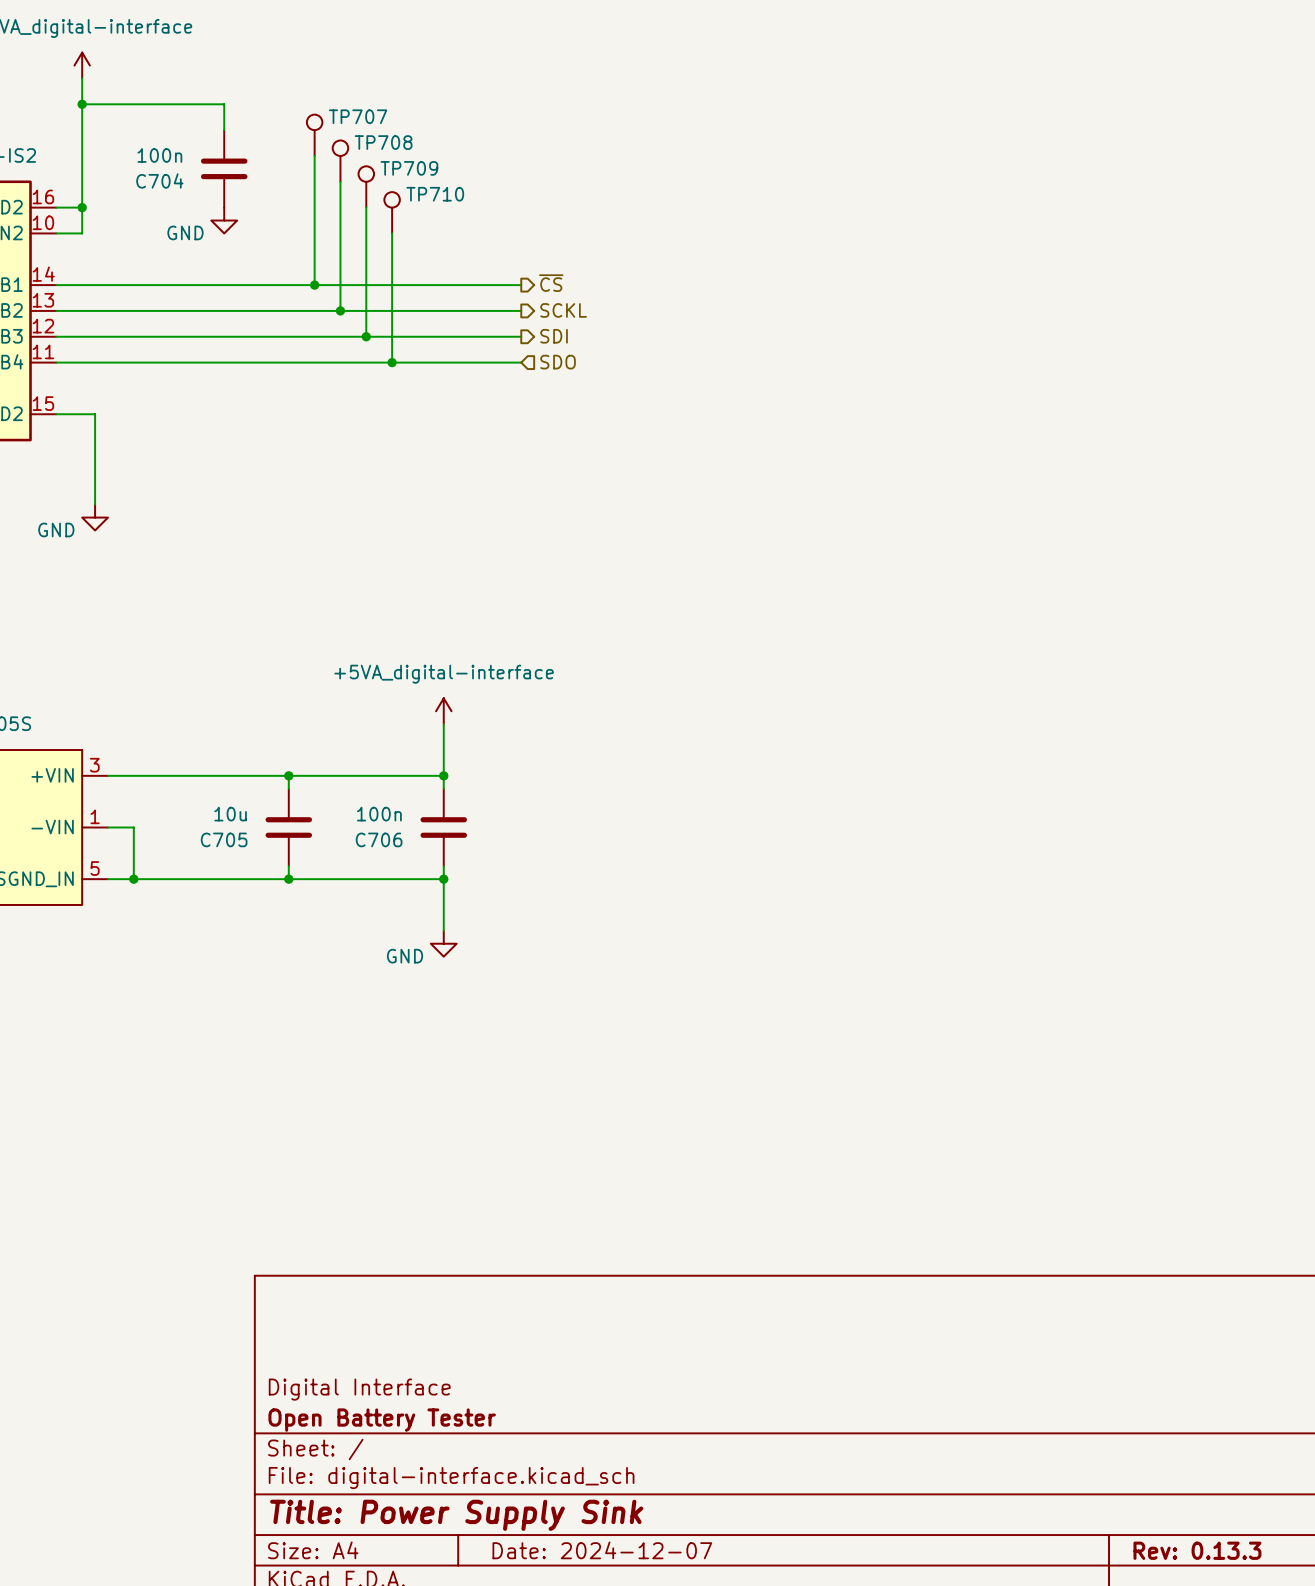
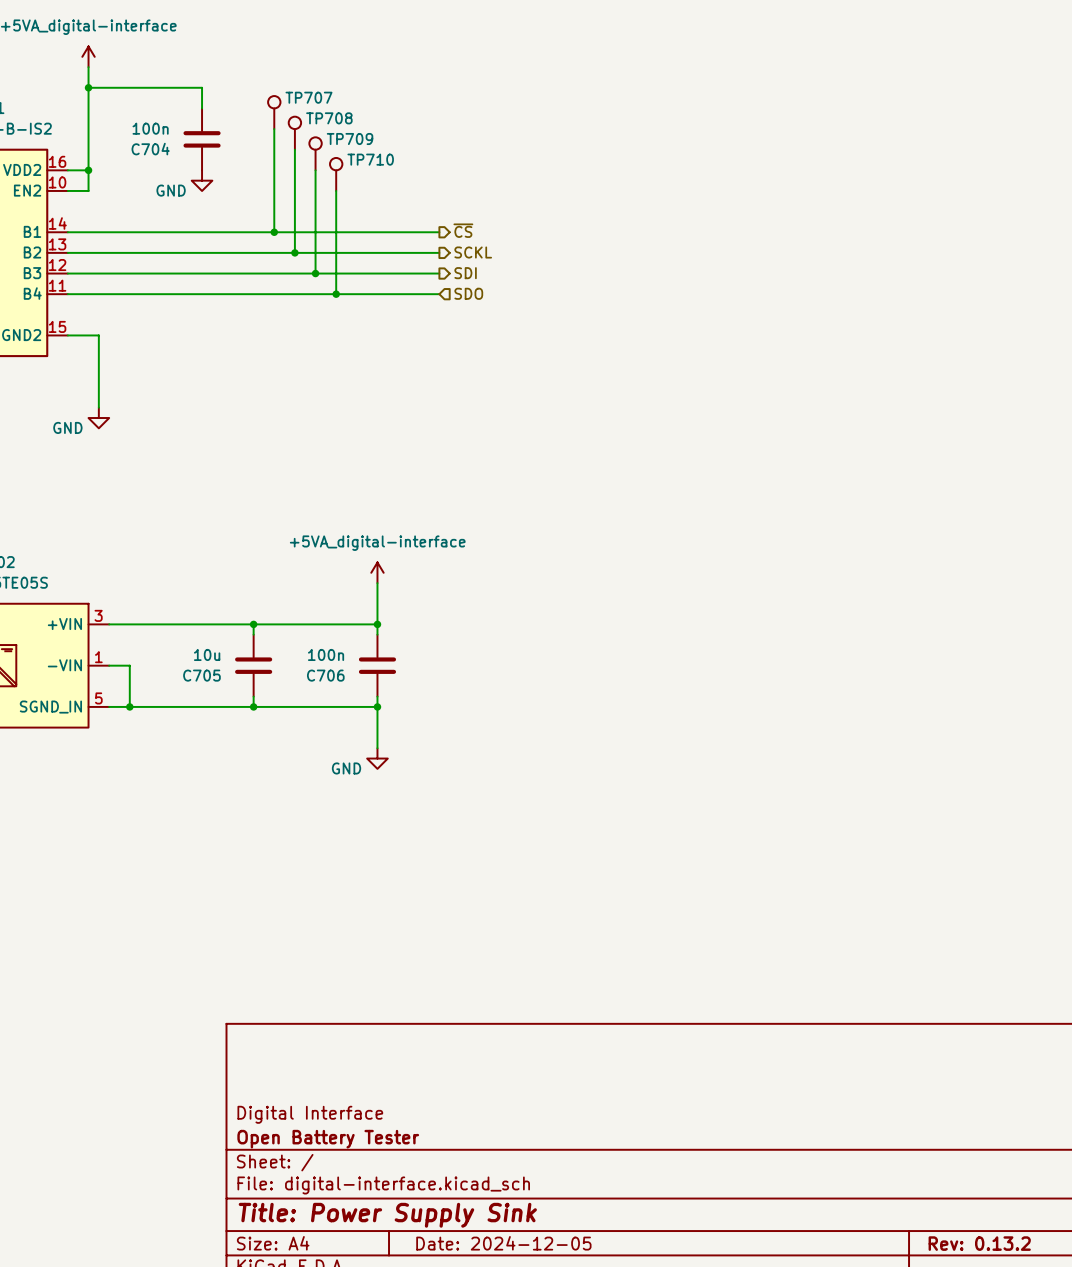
title block: Date: 2024-12-07 (602, 1550) -> Date: 2024-12-05 (503, 1243)
title block: Rev: 0.13.3 (1197, 1550) -> Rev: 0.13.2 (979, 1243)

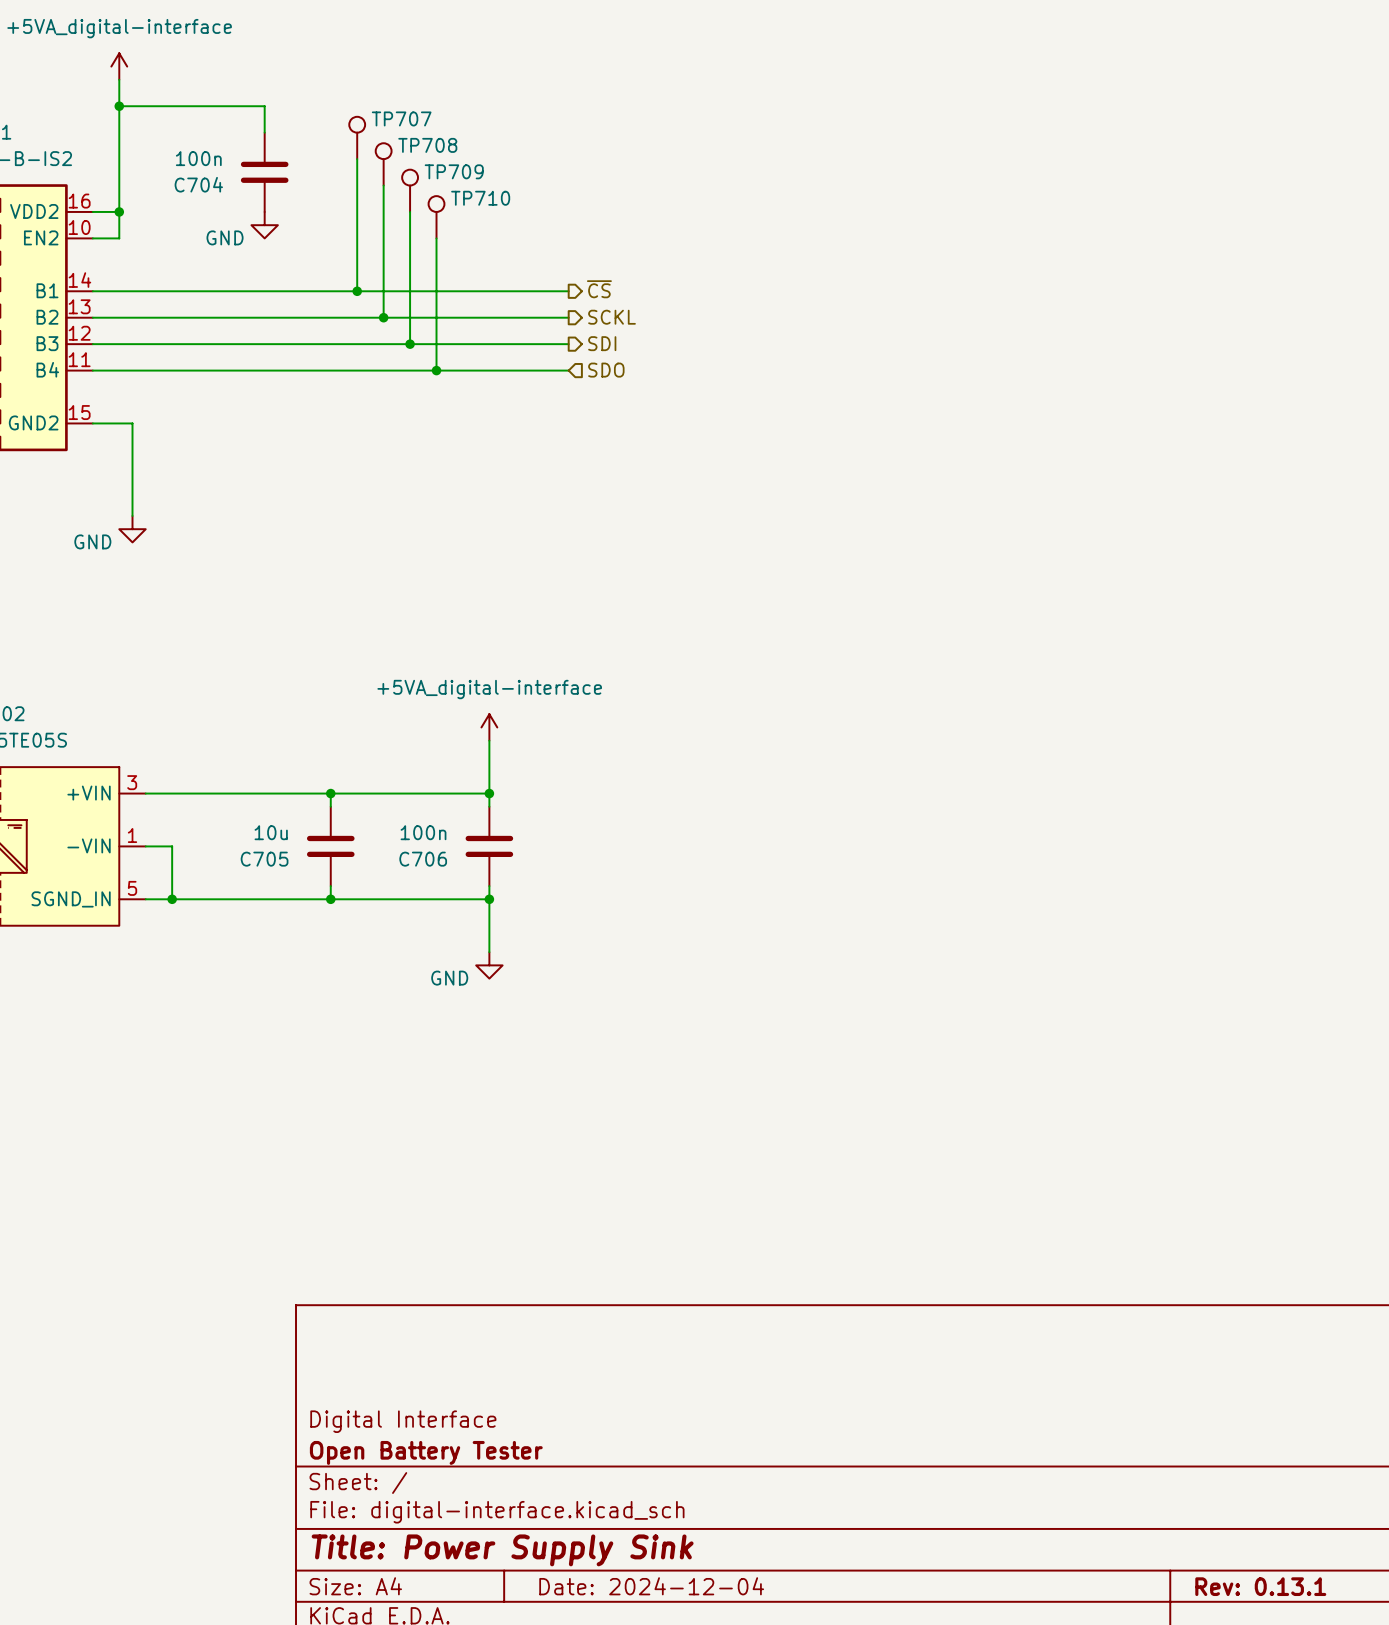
title block: Date: 2024-12-05 (503, 1243) -> Date: 2024-12-04 (651, 1586)
title block: Rev: 0.13.2 (979, 1243) -> Rev: 0.13.1 (1260, 1586)

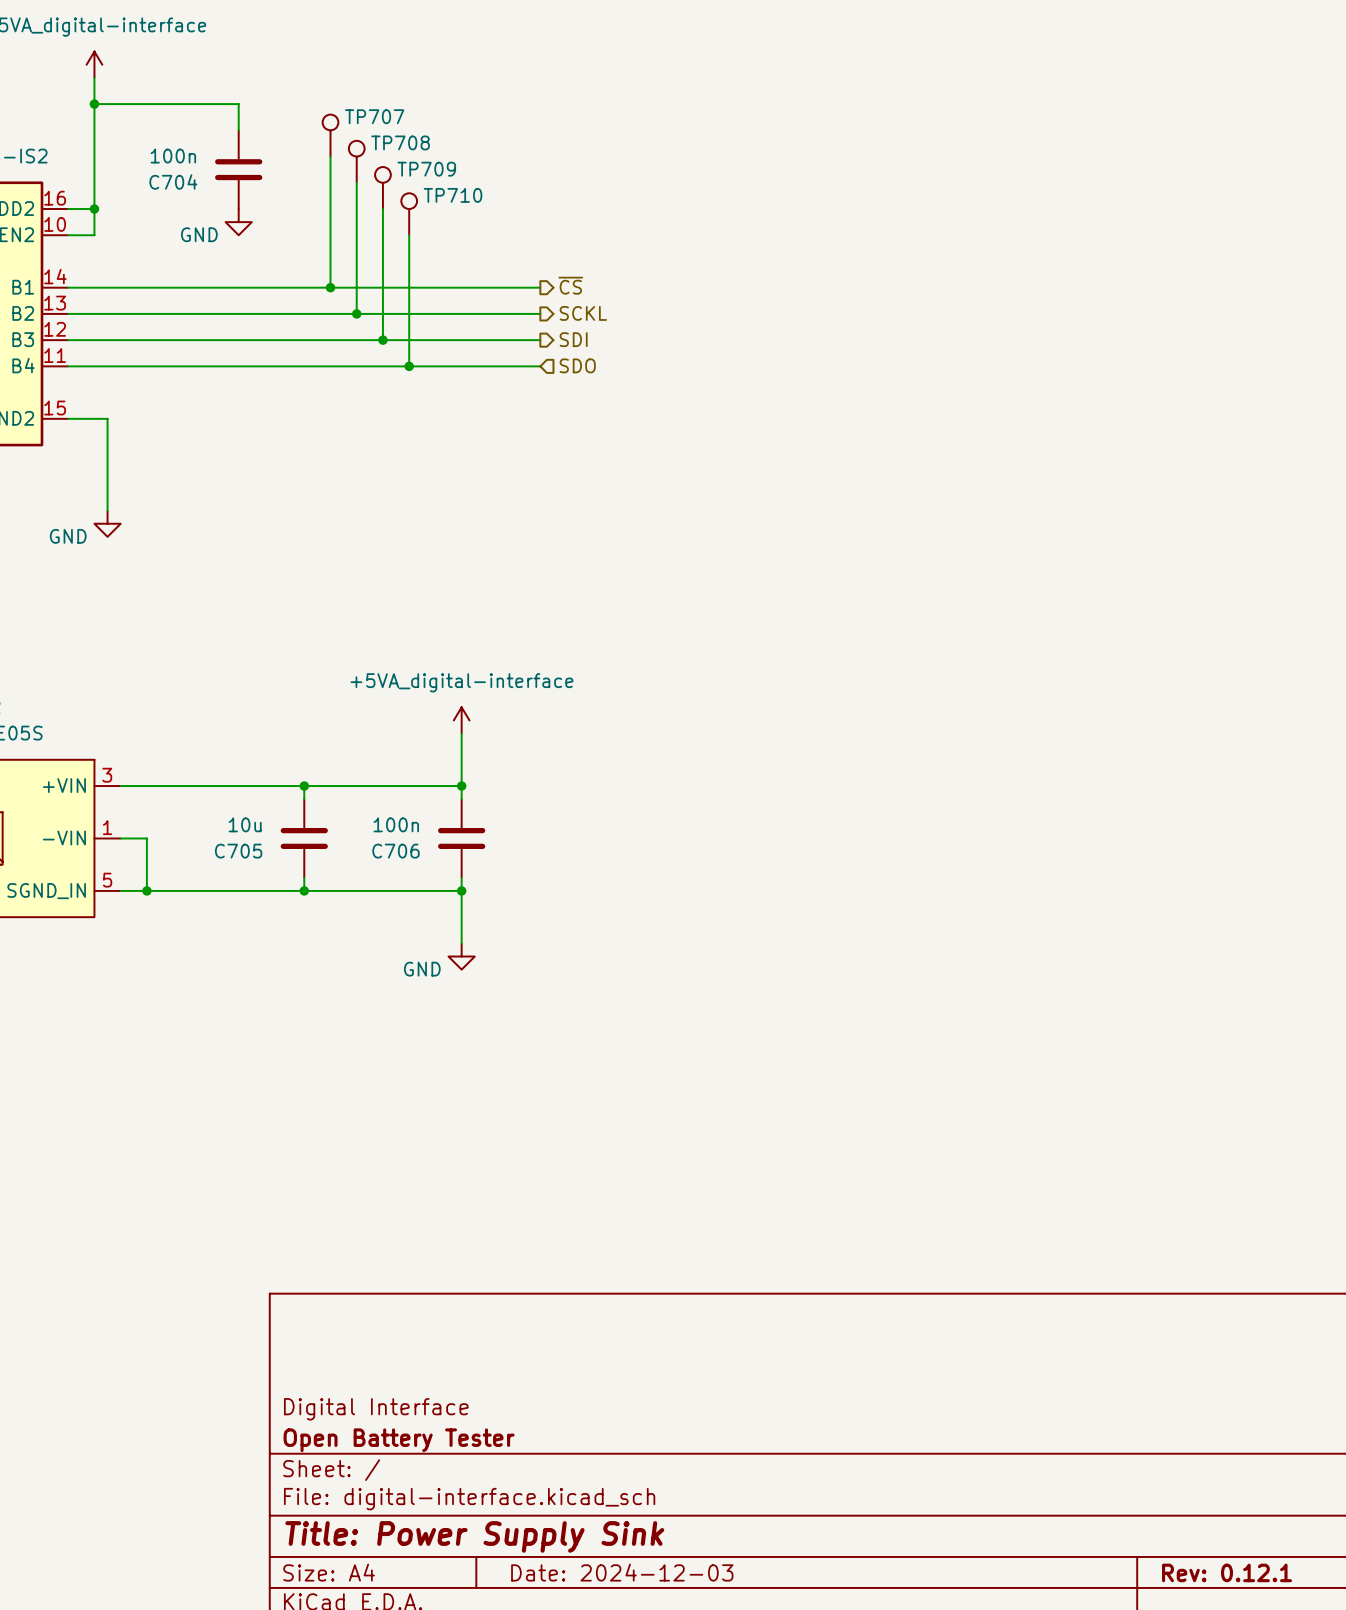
title block: Date: 2024-12-04 (651, 1586) -> Date: 2024-12-03 (622, 1572)
title block: Rev: 0.13.1 (1260, 1586) -> Rev: 0.12.1 (1227, 1572)

